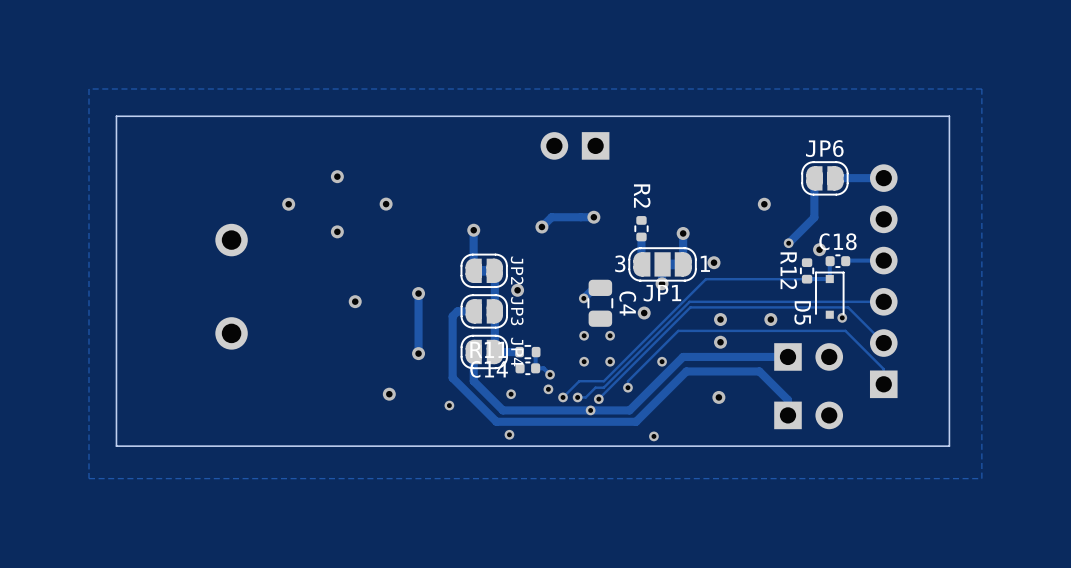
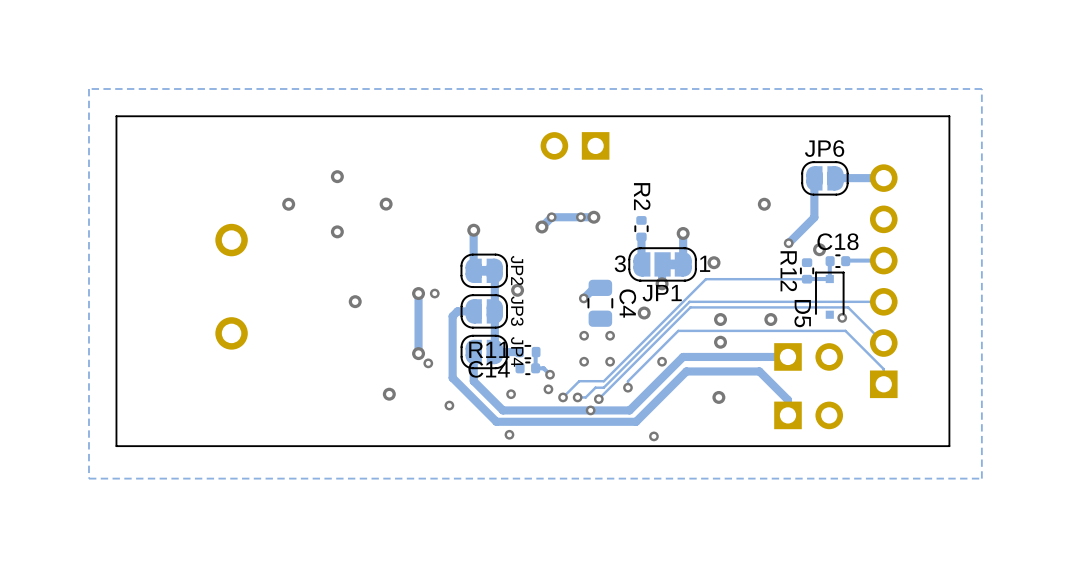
via: none -> (551, 217)
via: none -> (580, 217)
via: none -> (434, 293)
via: none -> (428, 363)

